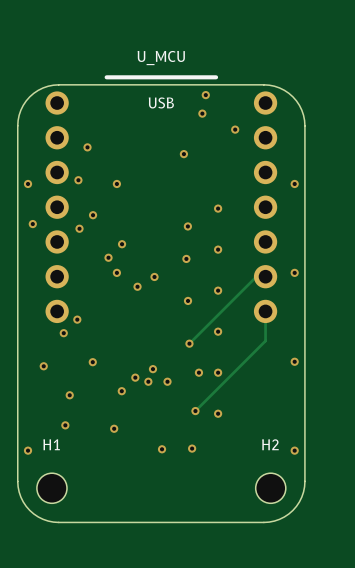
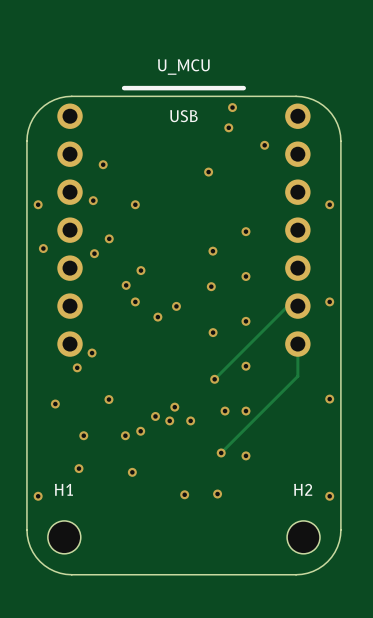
via: none -> (125, 435)

